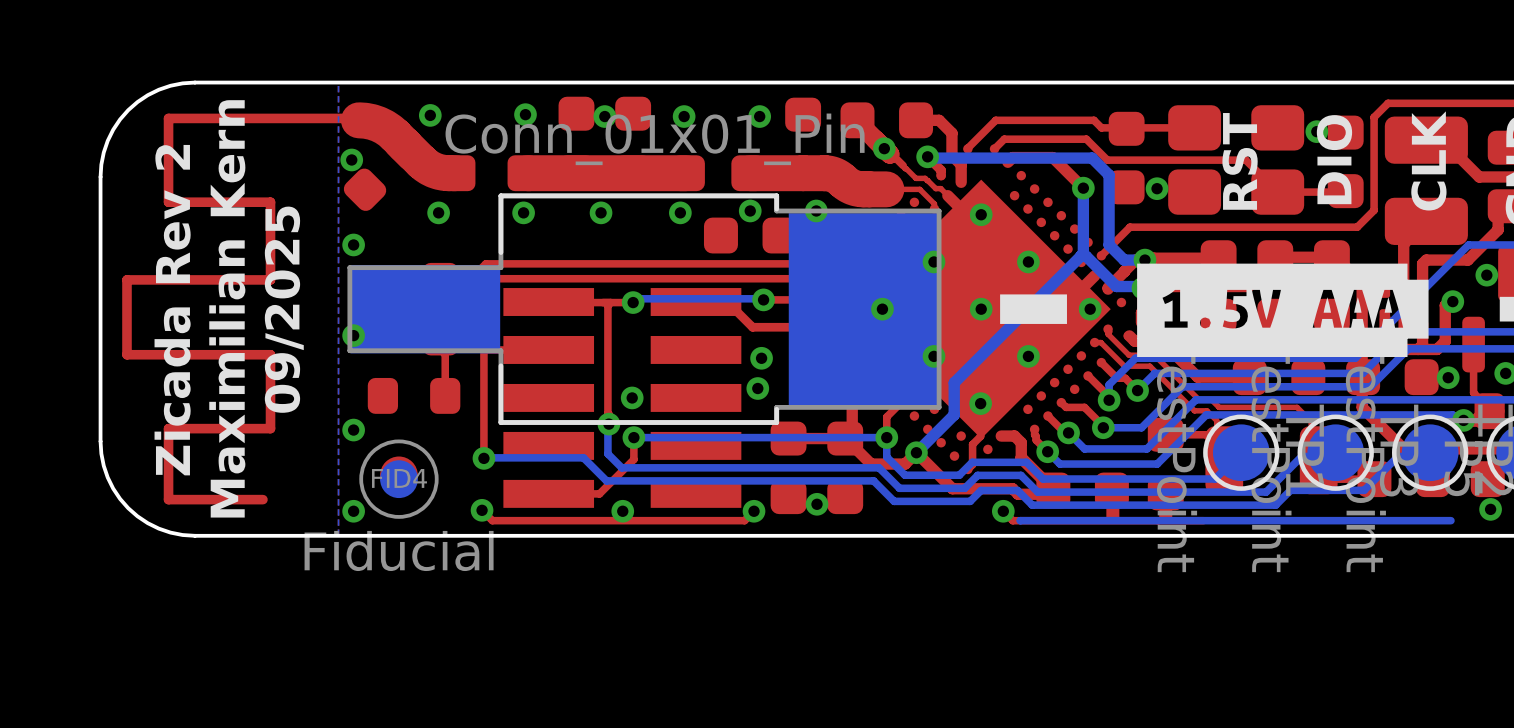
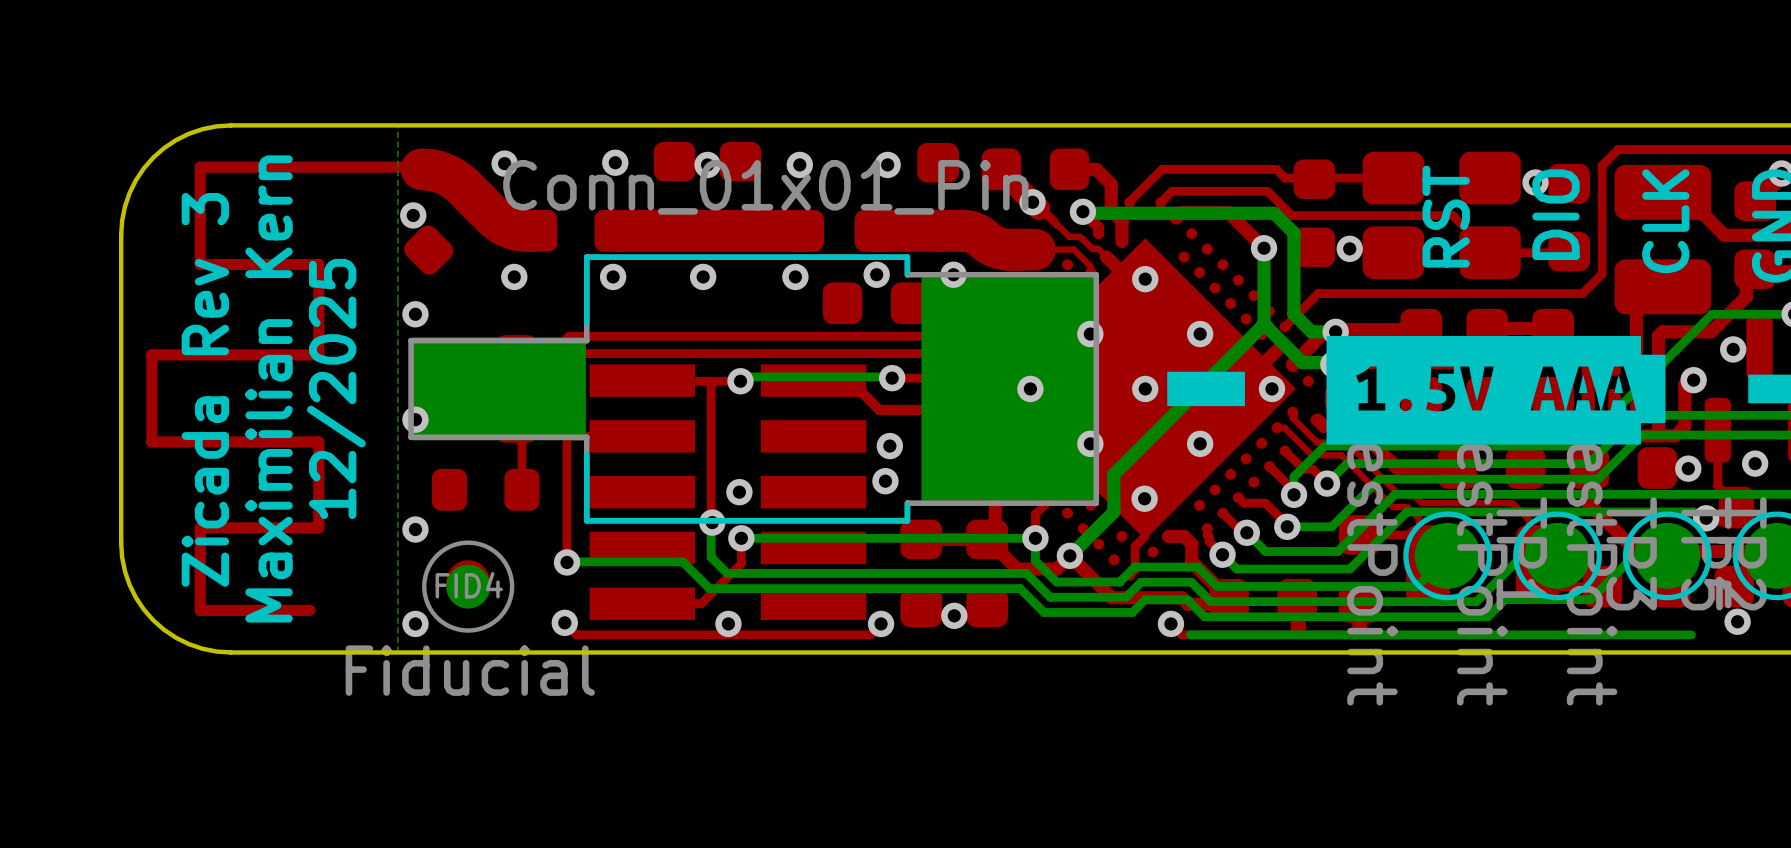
text: 09/2025 (284, 309) -> 12/2025 (336, 388)
text: Zicada Rev 2 (172, 310) -> Zicada Rev 3 (205, 389)

